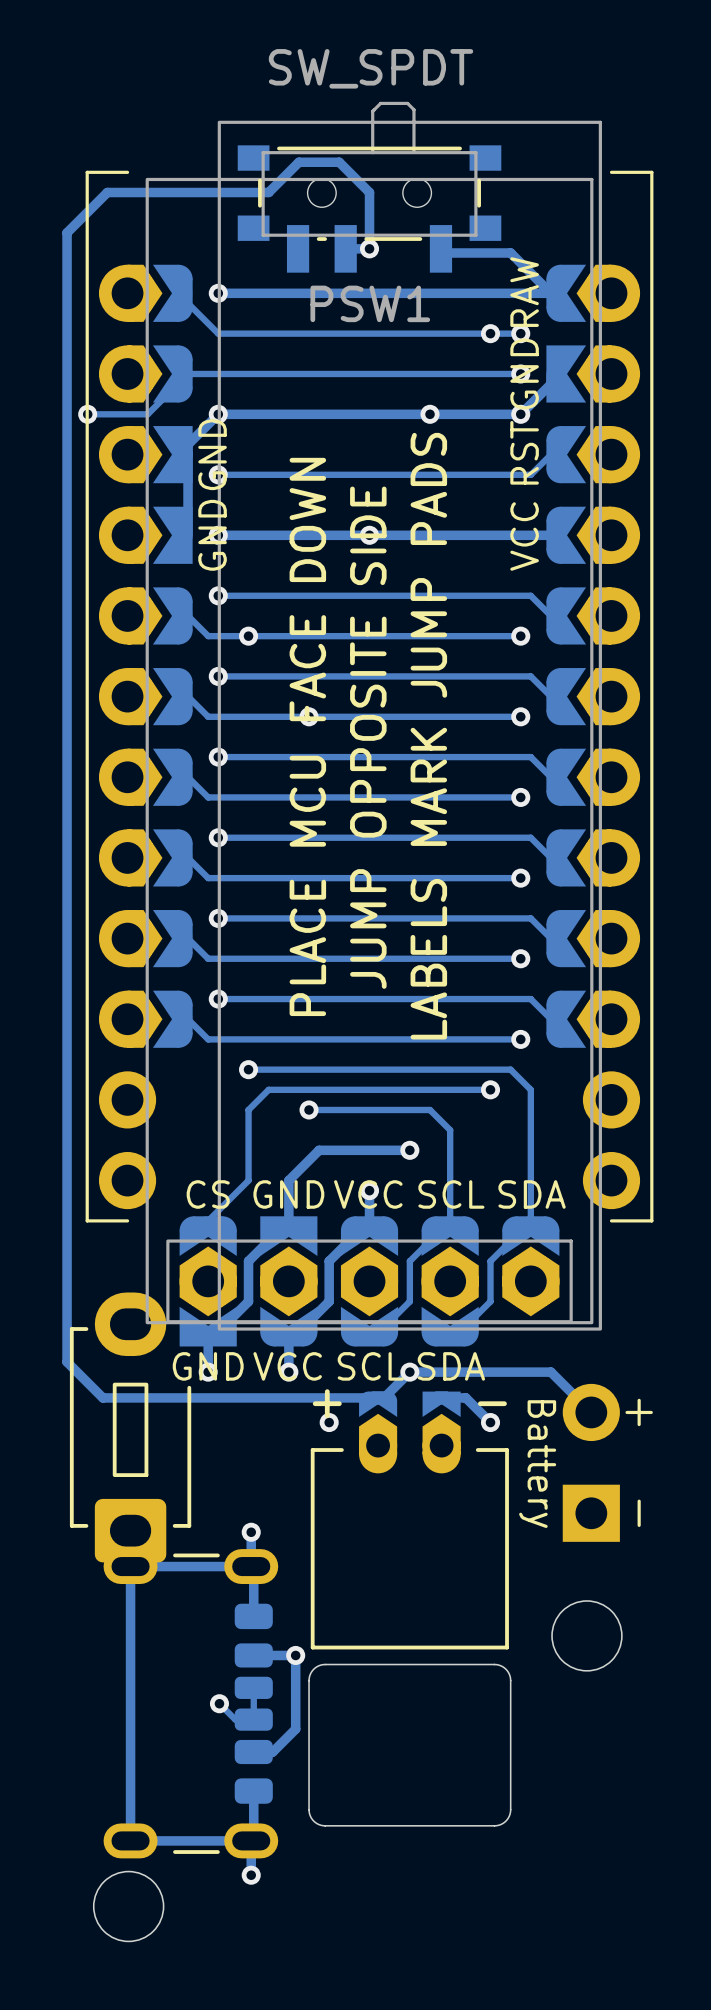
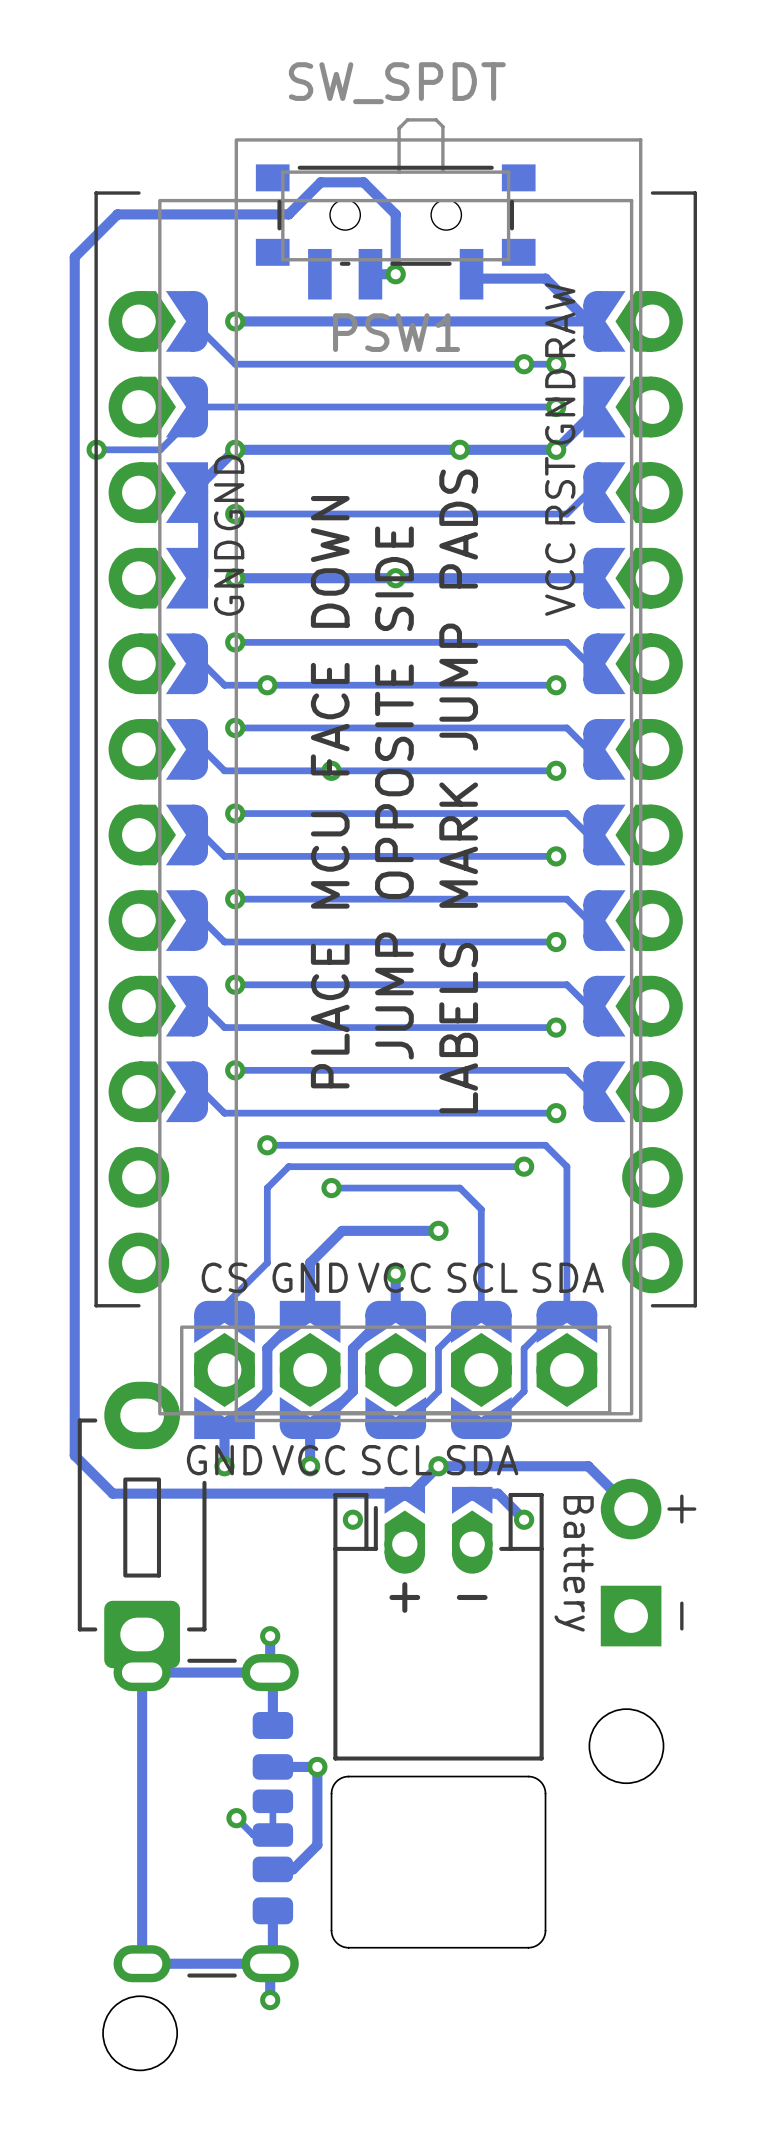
part footprint: [145, 120, 602, 1347] -> [158, 138, 643, 1440]
part footprint: [85, 170, 654, 1223] -> [94, 191, 697, 1308]
part footprint: [310, 1391, 509, 1650] -> [333, 1486, 544, 1761]

